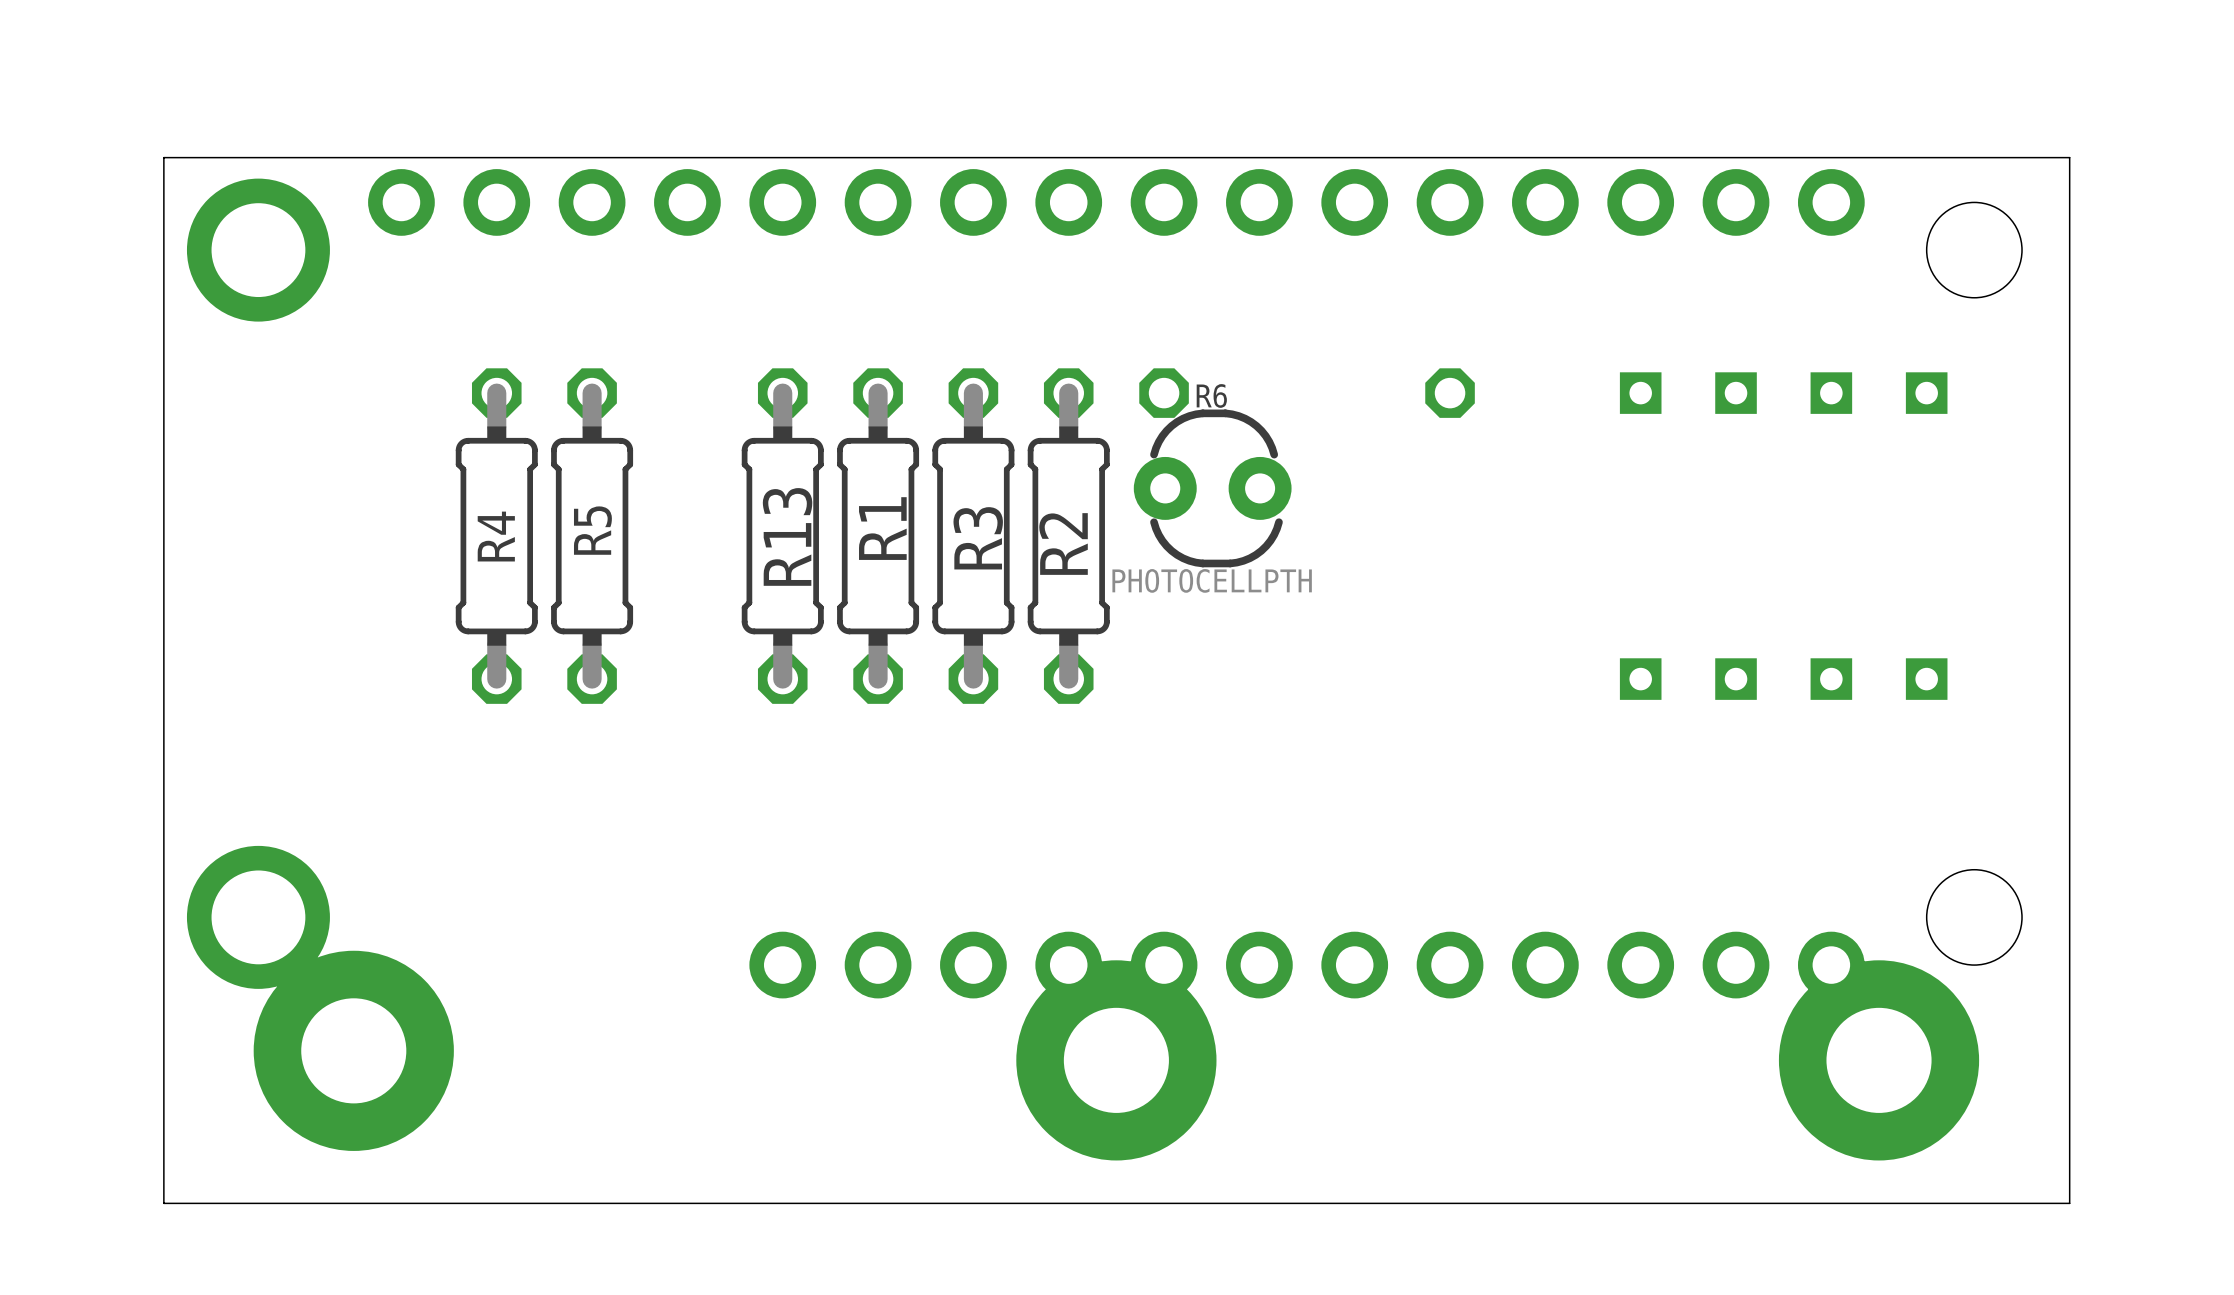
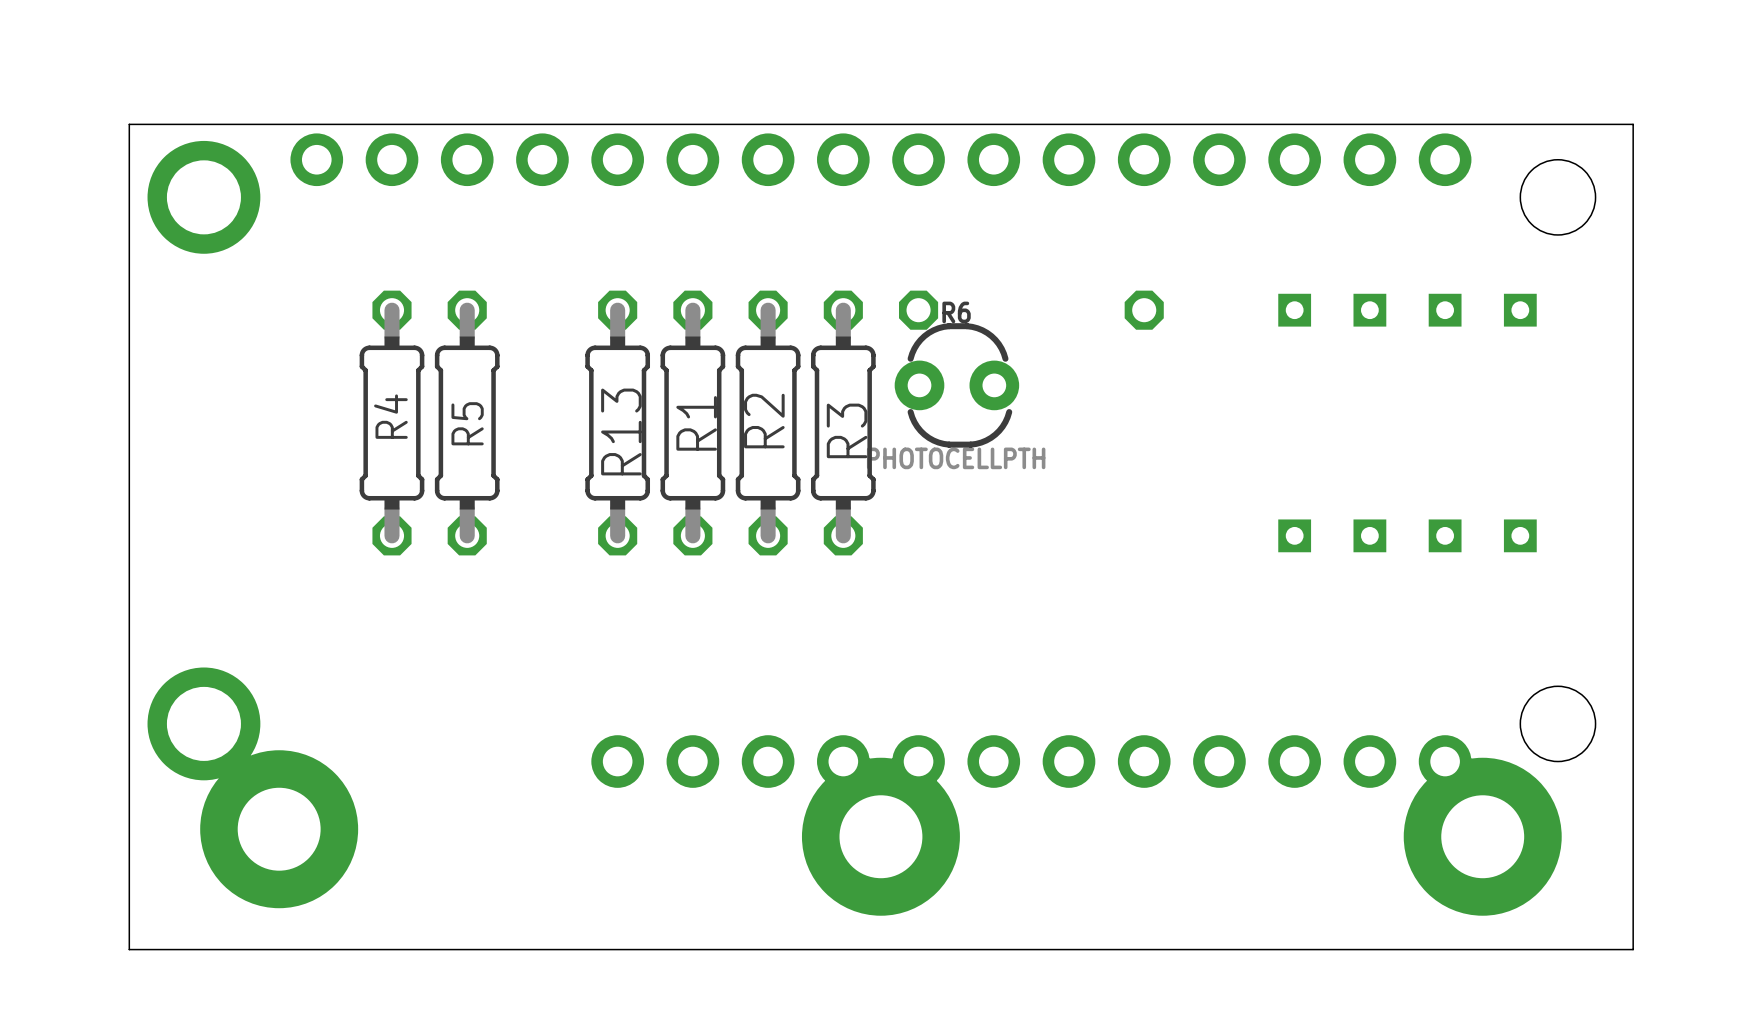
R3 name: R3 (978, 538) -> R2 (764, 421)
R2 name: R2 (1063, 544) -> R3 (847, 430)

